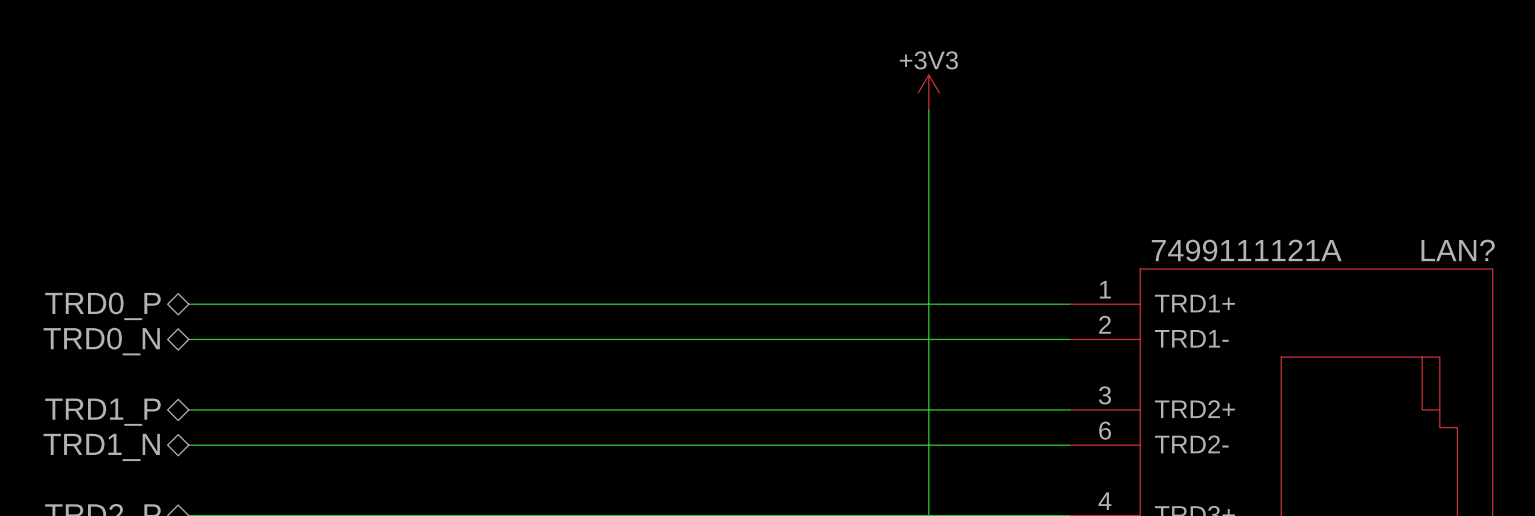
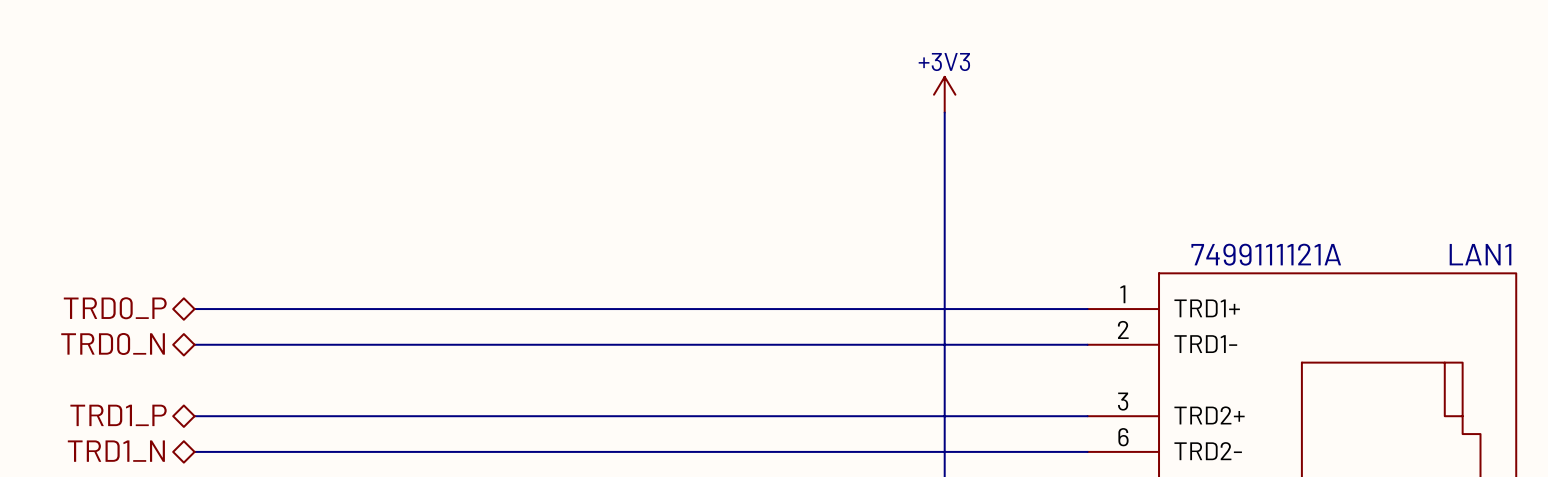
LAN? name: LAN? (1458, 250) -> LAN1 (1480, 254)

